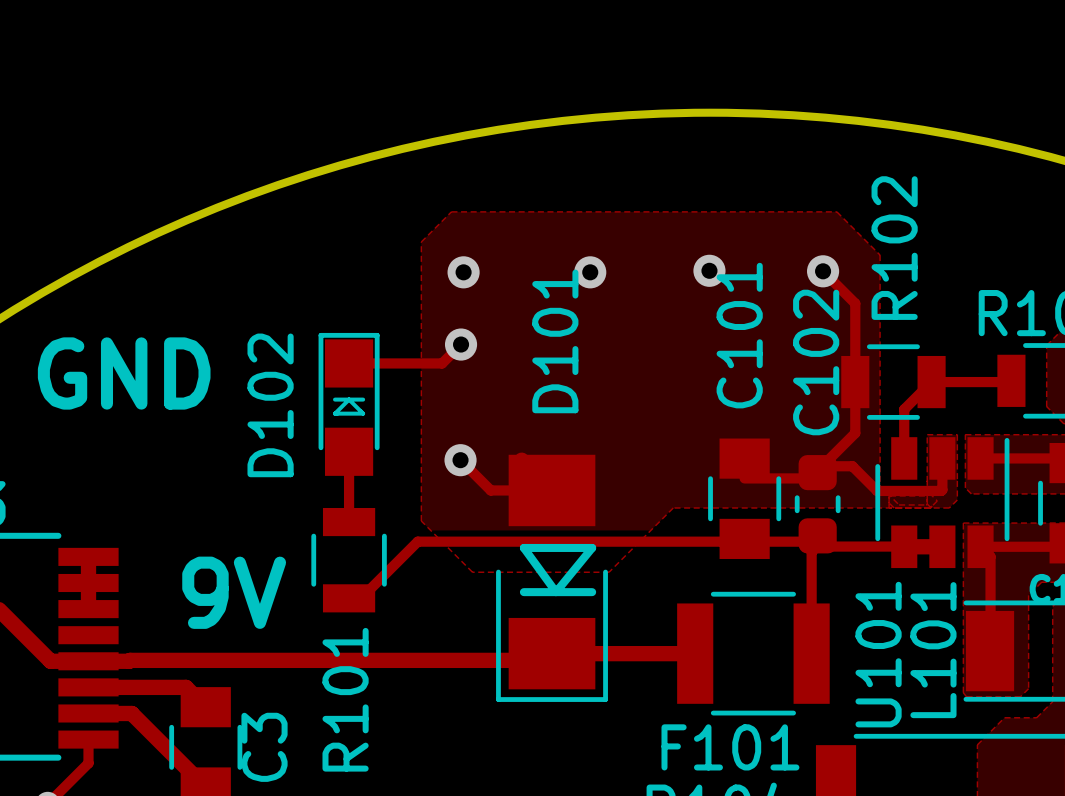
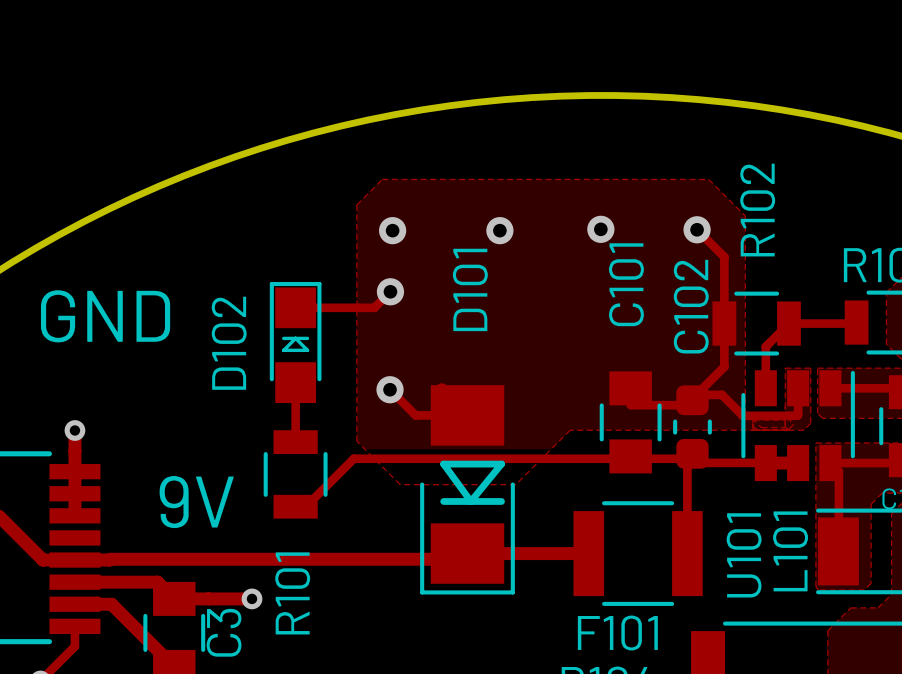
track: none -> (74, 430) (74, 471)
via: none -> (74, 430)
track: none -> (174, 598) (252, 598)
via: none -> (252, 598)

